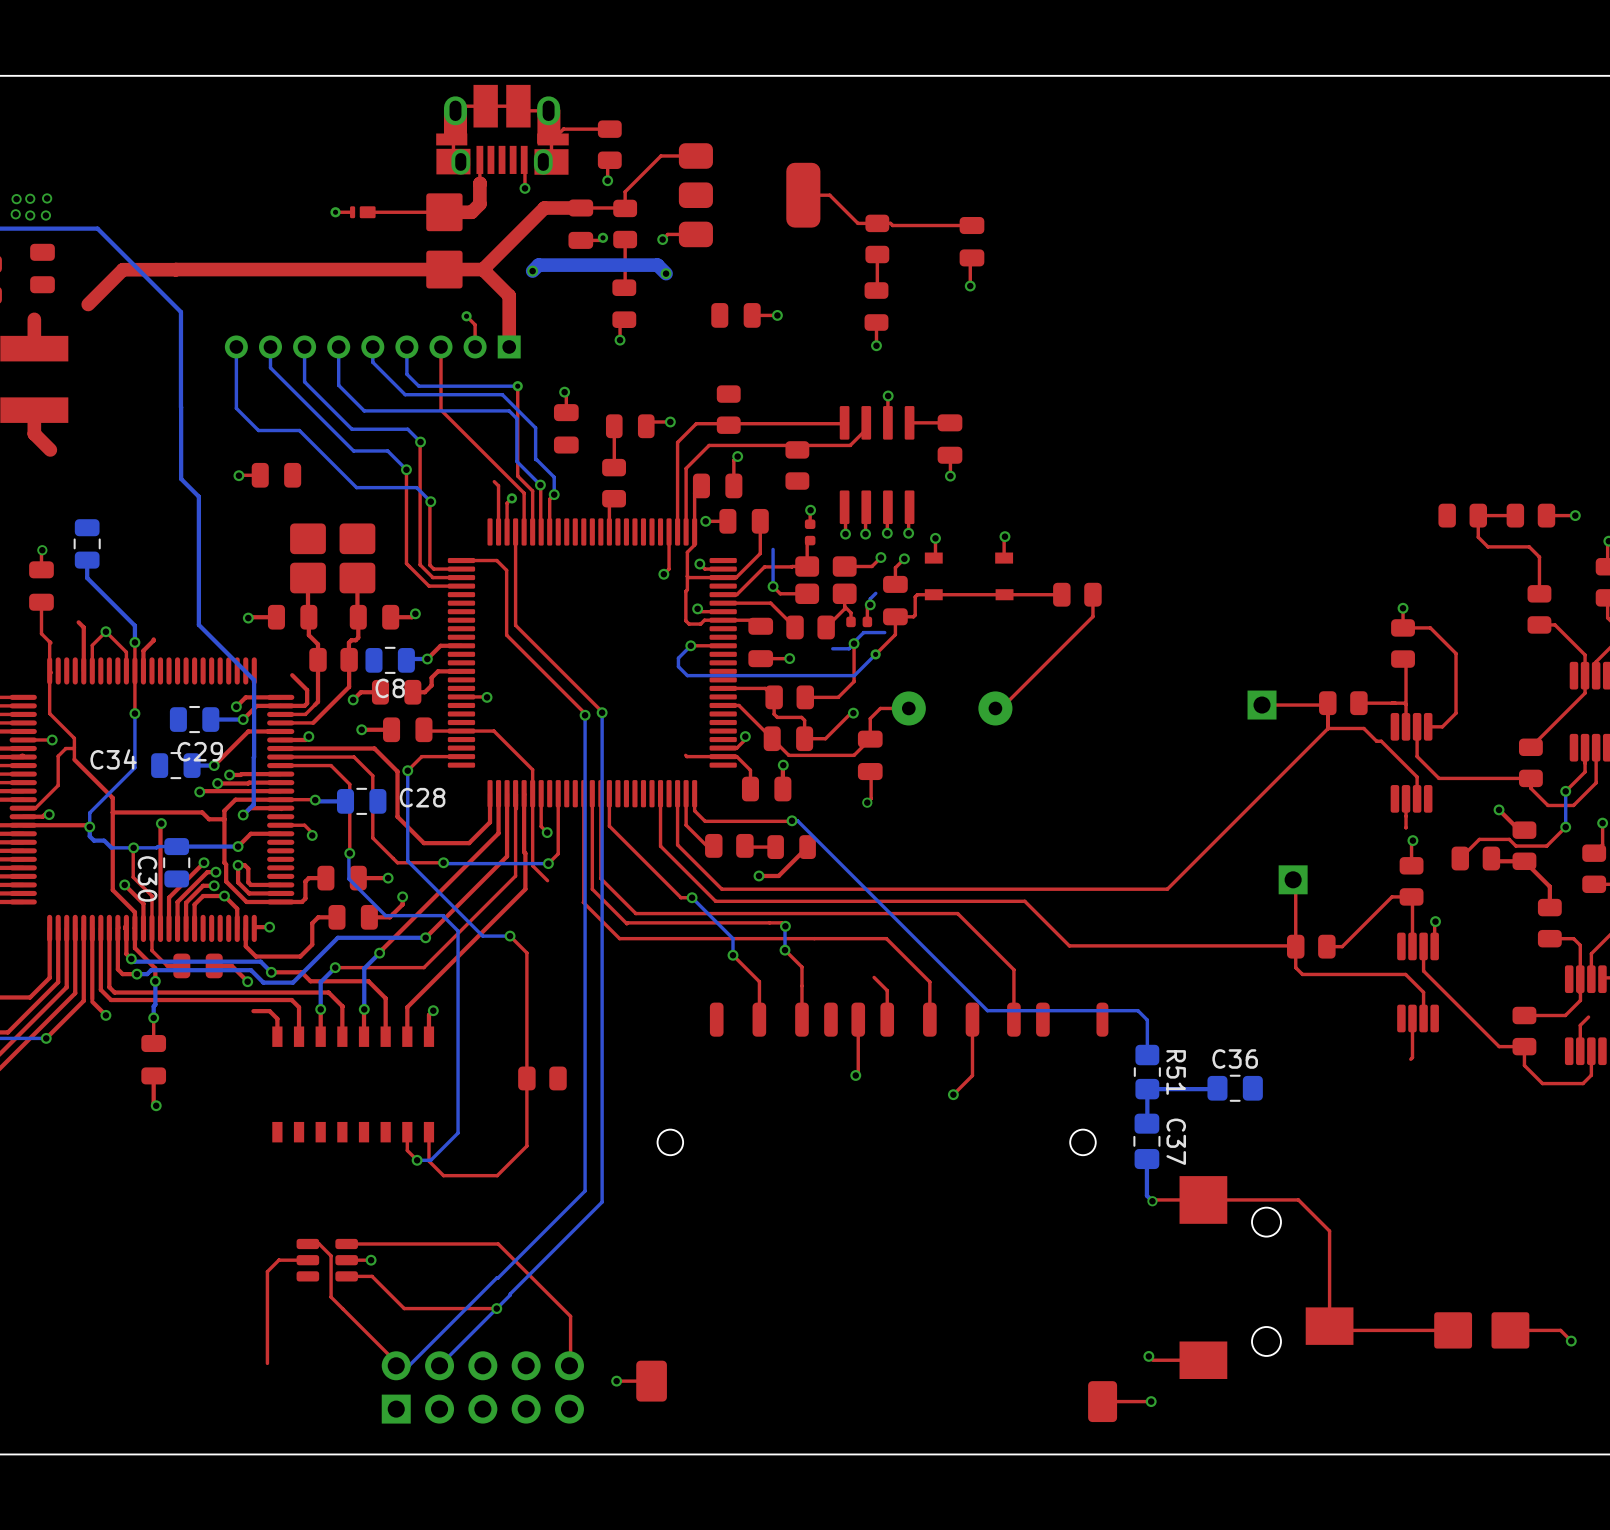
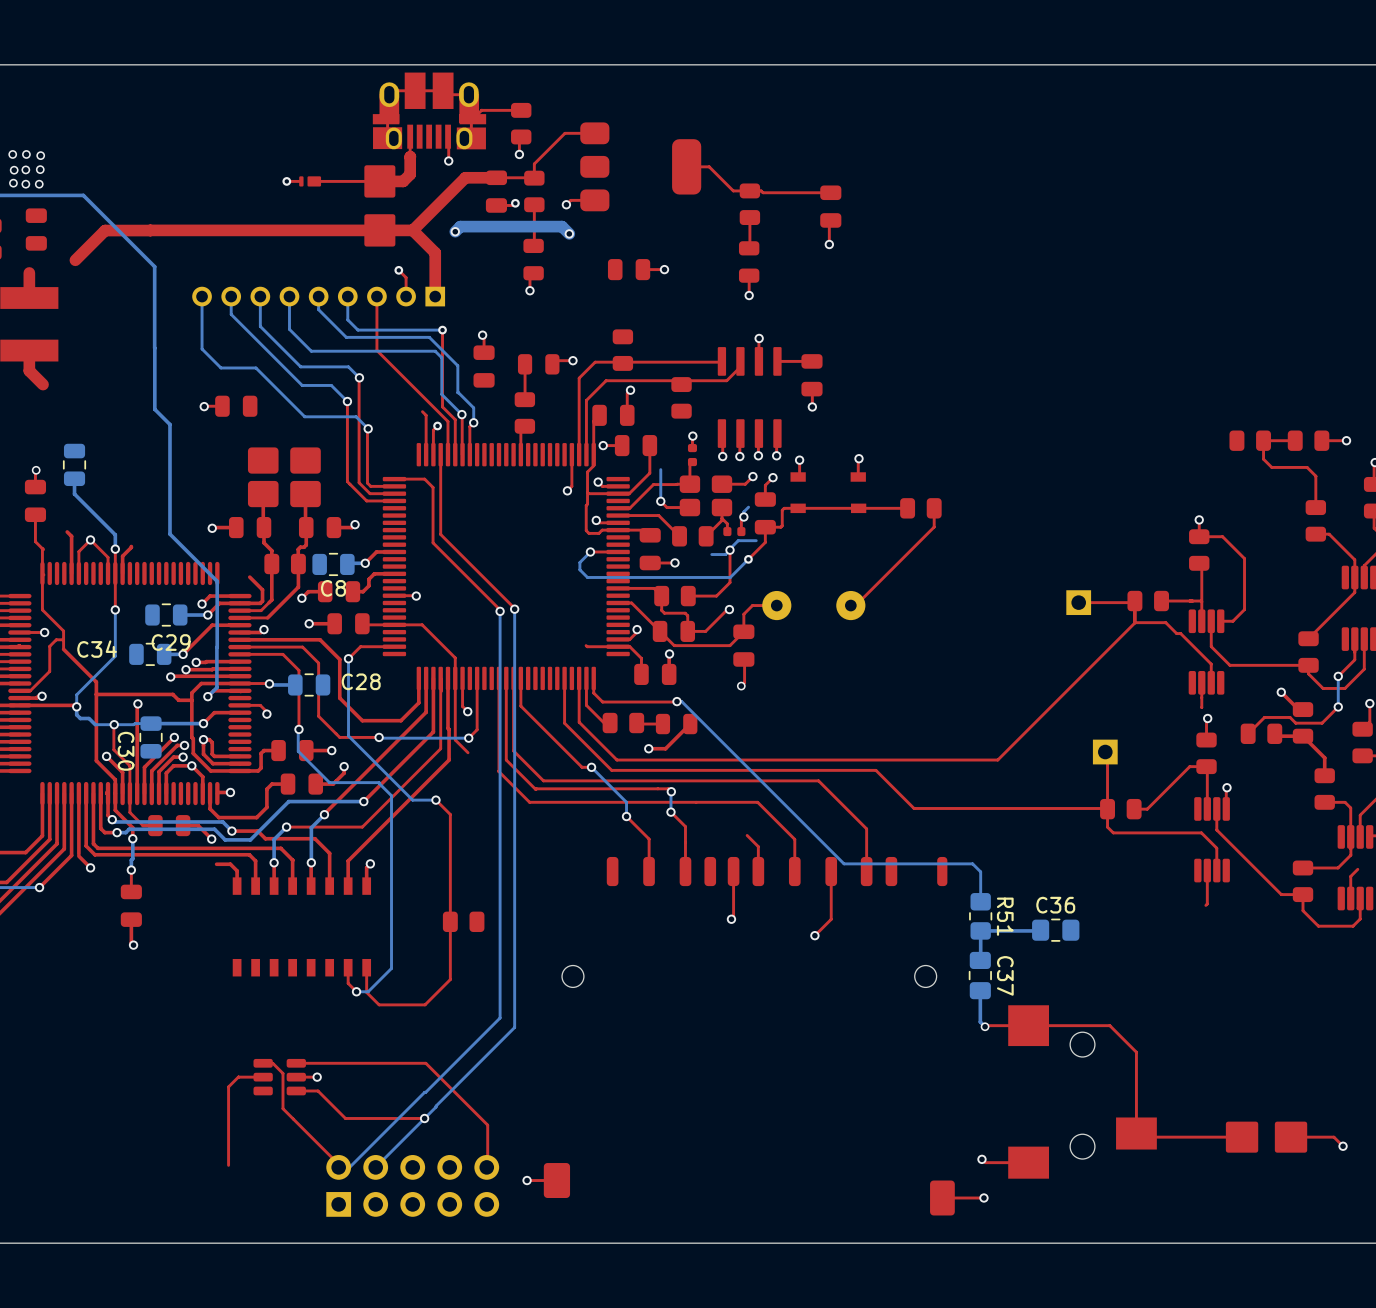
via: none -> (12, 154)
via: none -> (26, 154)
via: none -> (40, 155)

